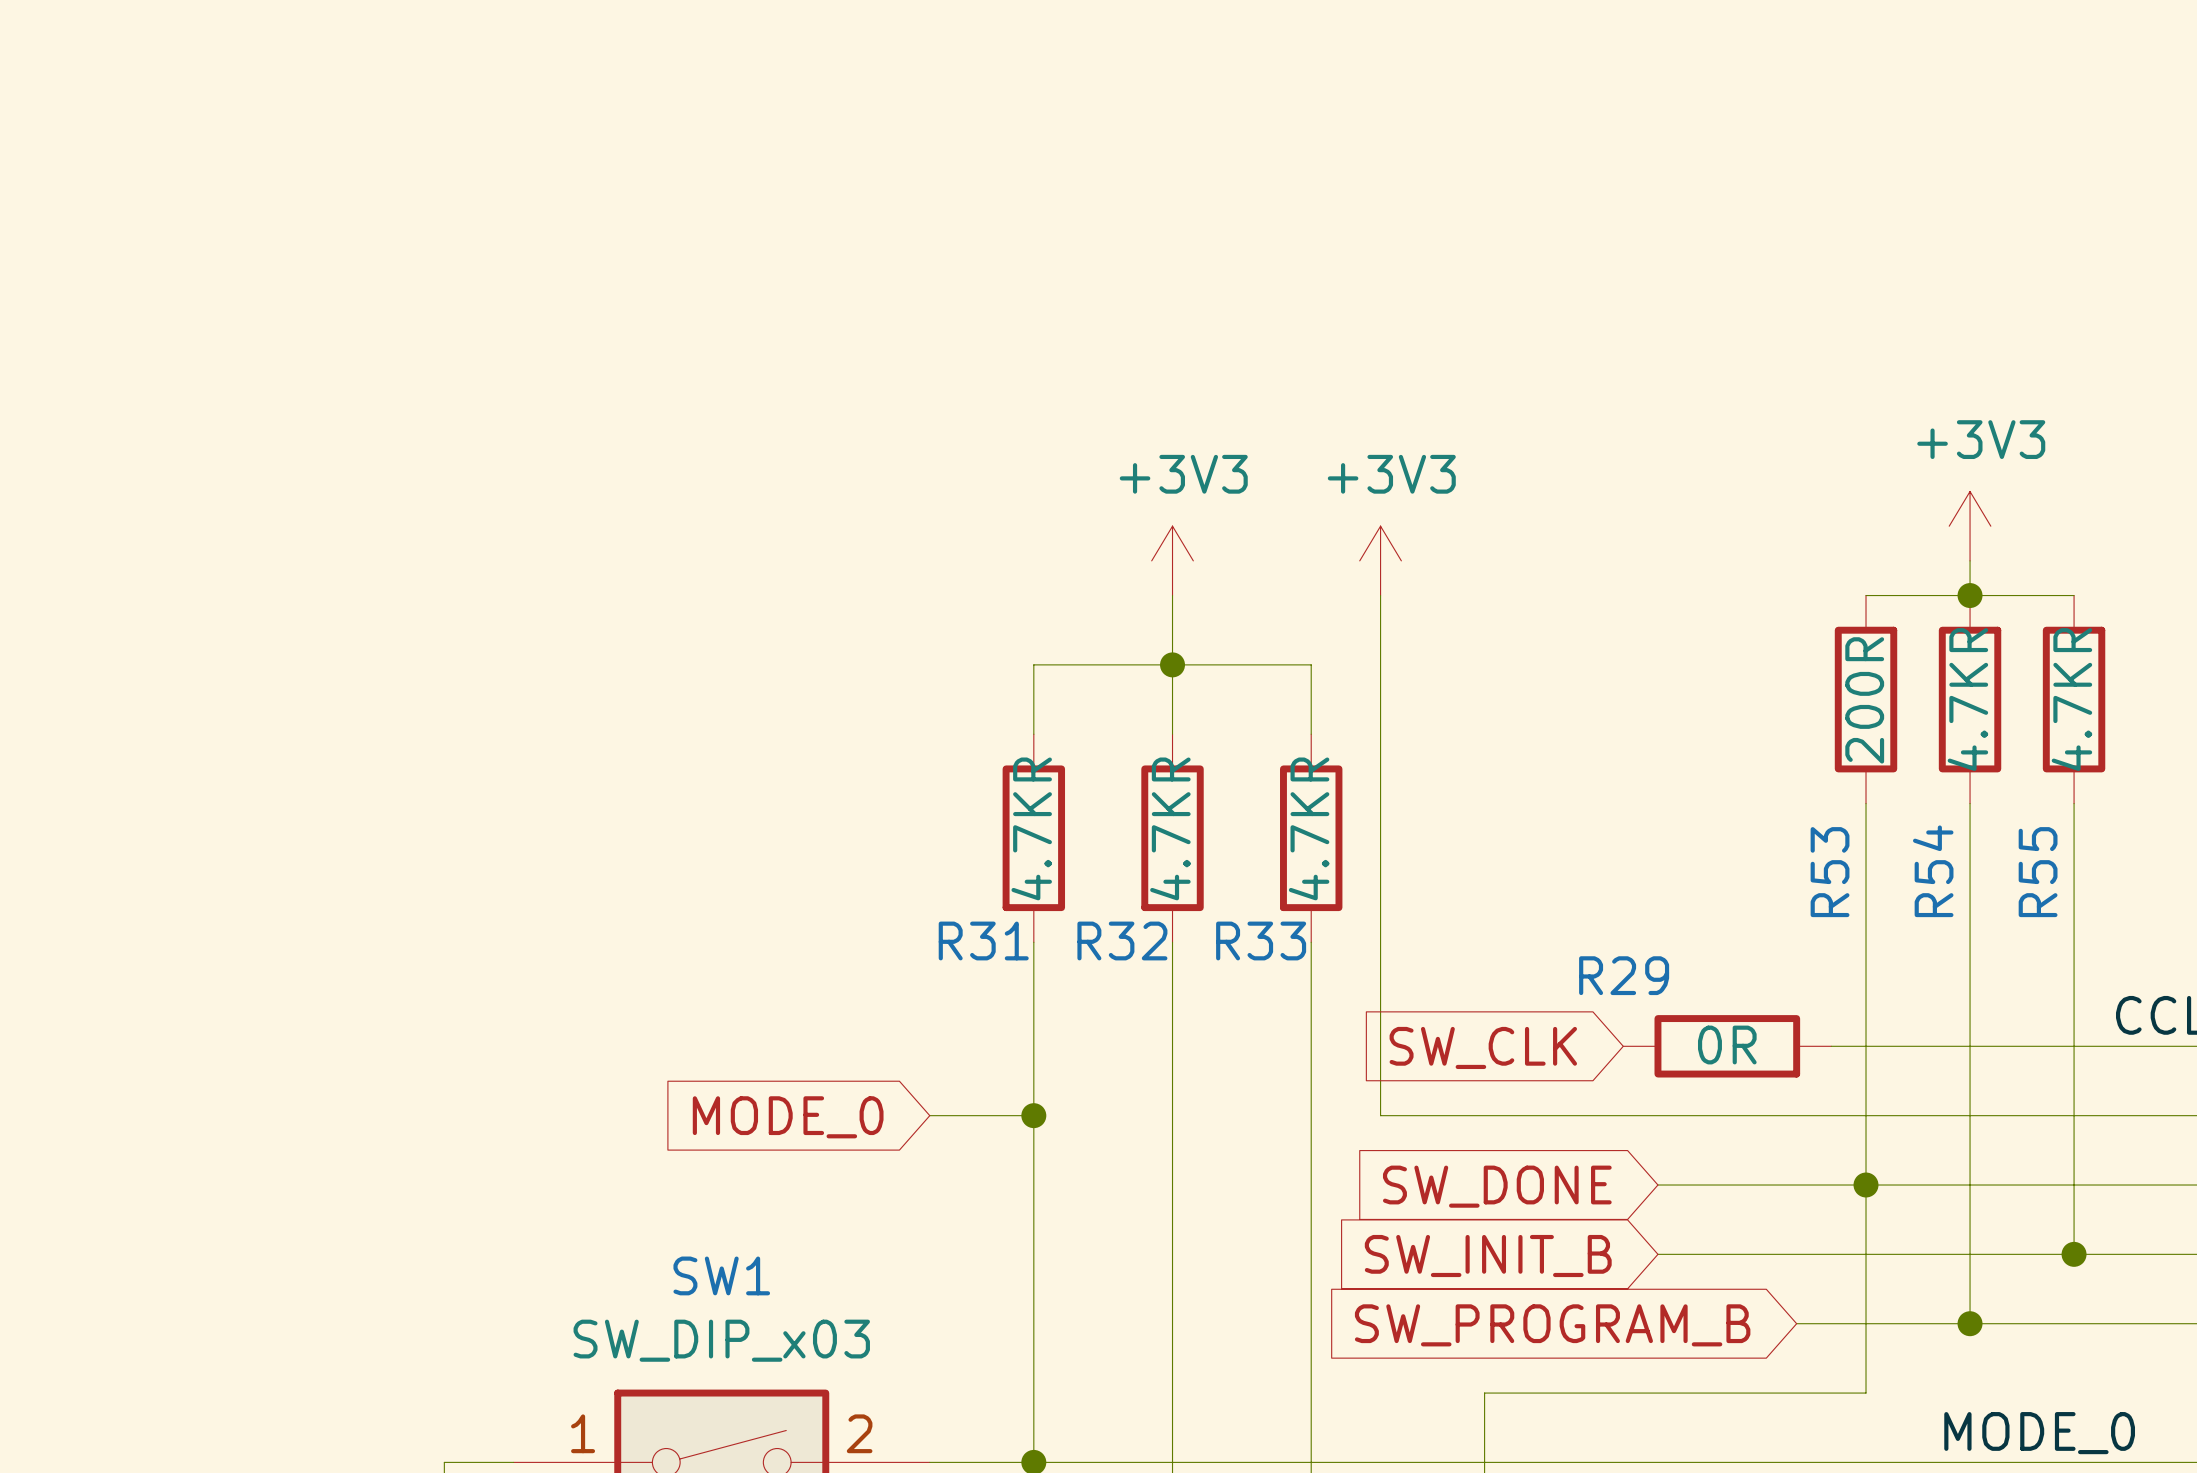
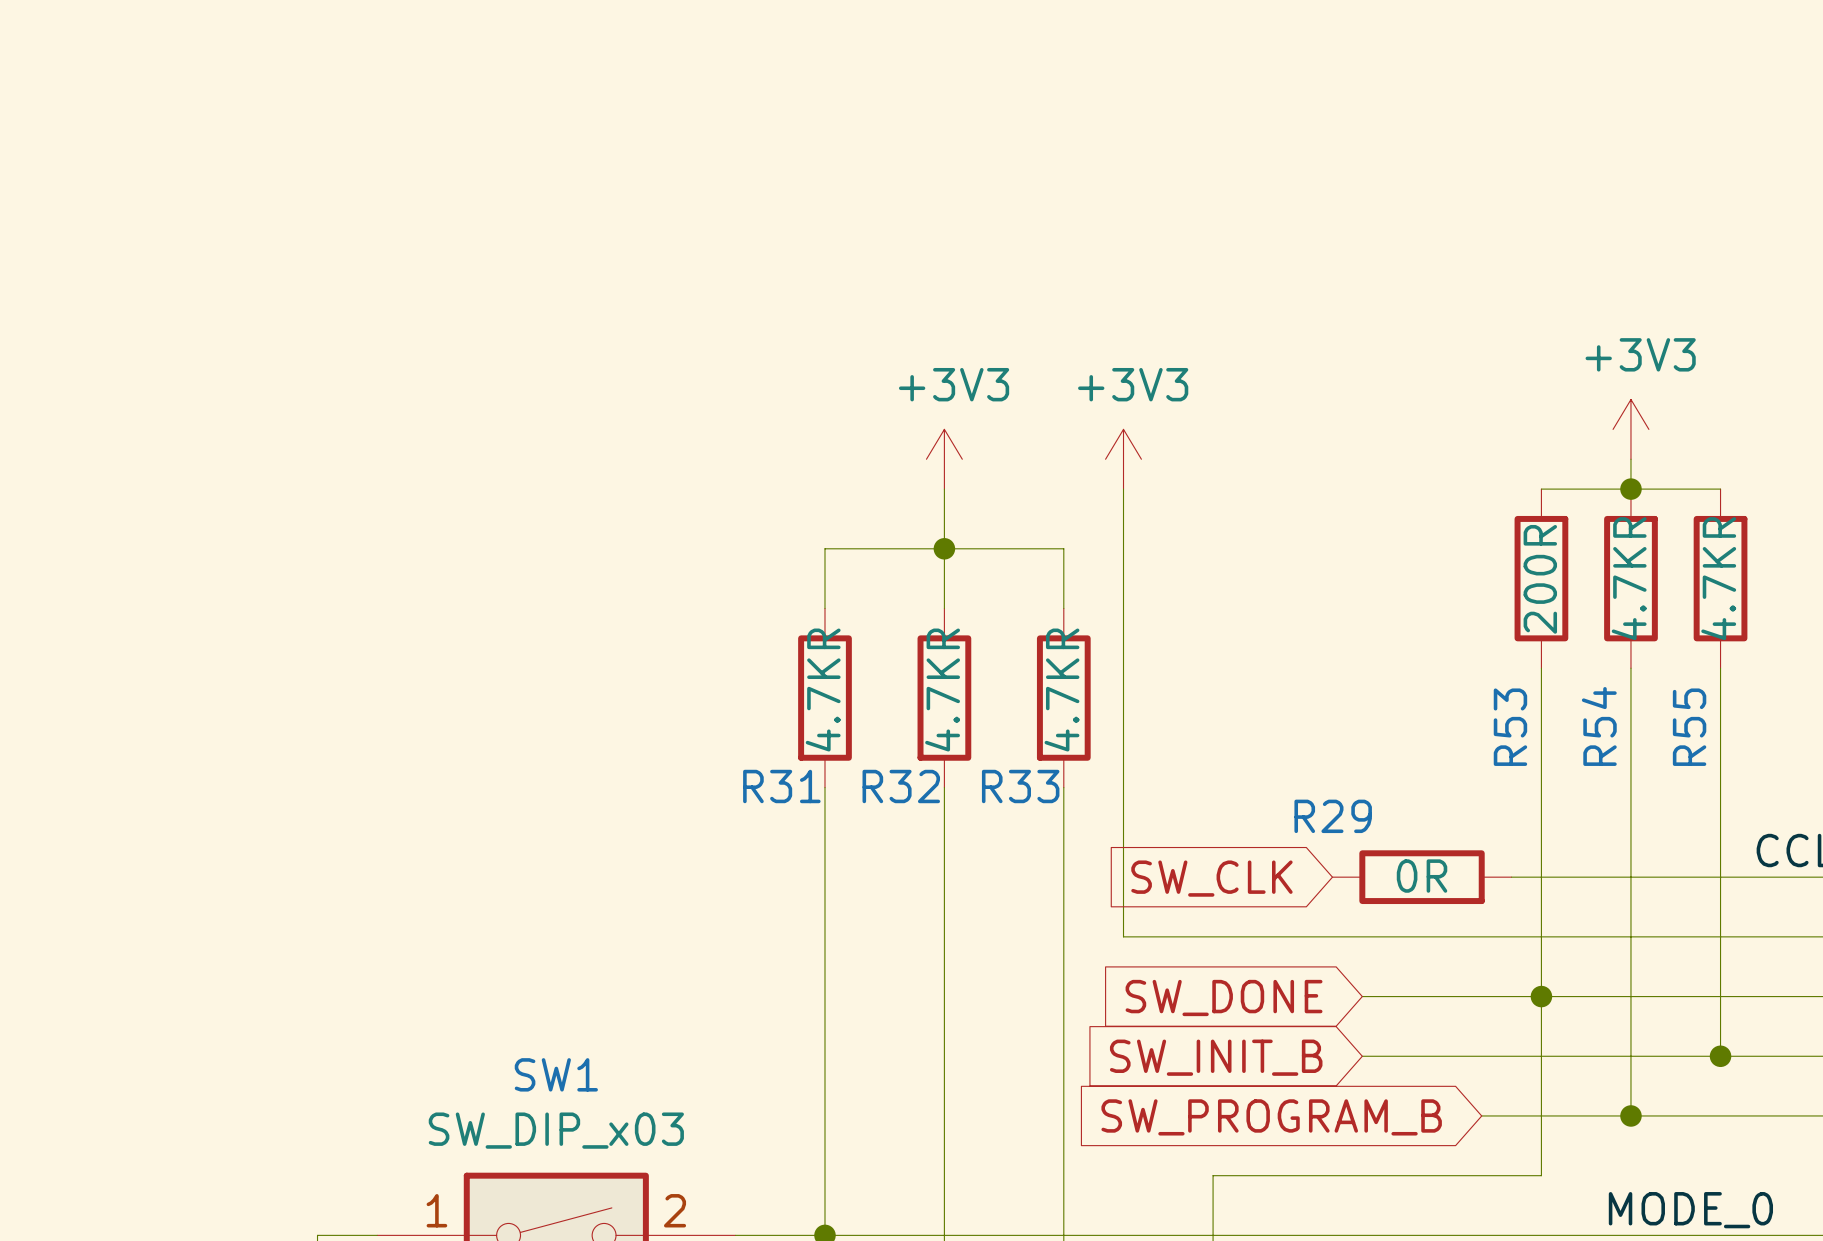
wire: (929, 1115) (1033, 1115) -> none
junction: (1033, 1115) -> none
global label: MODE_0 (788, 1117) -> none

